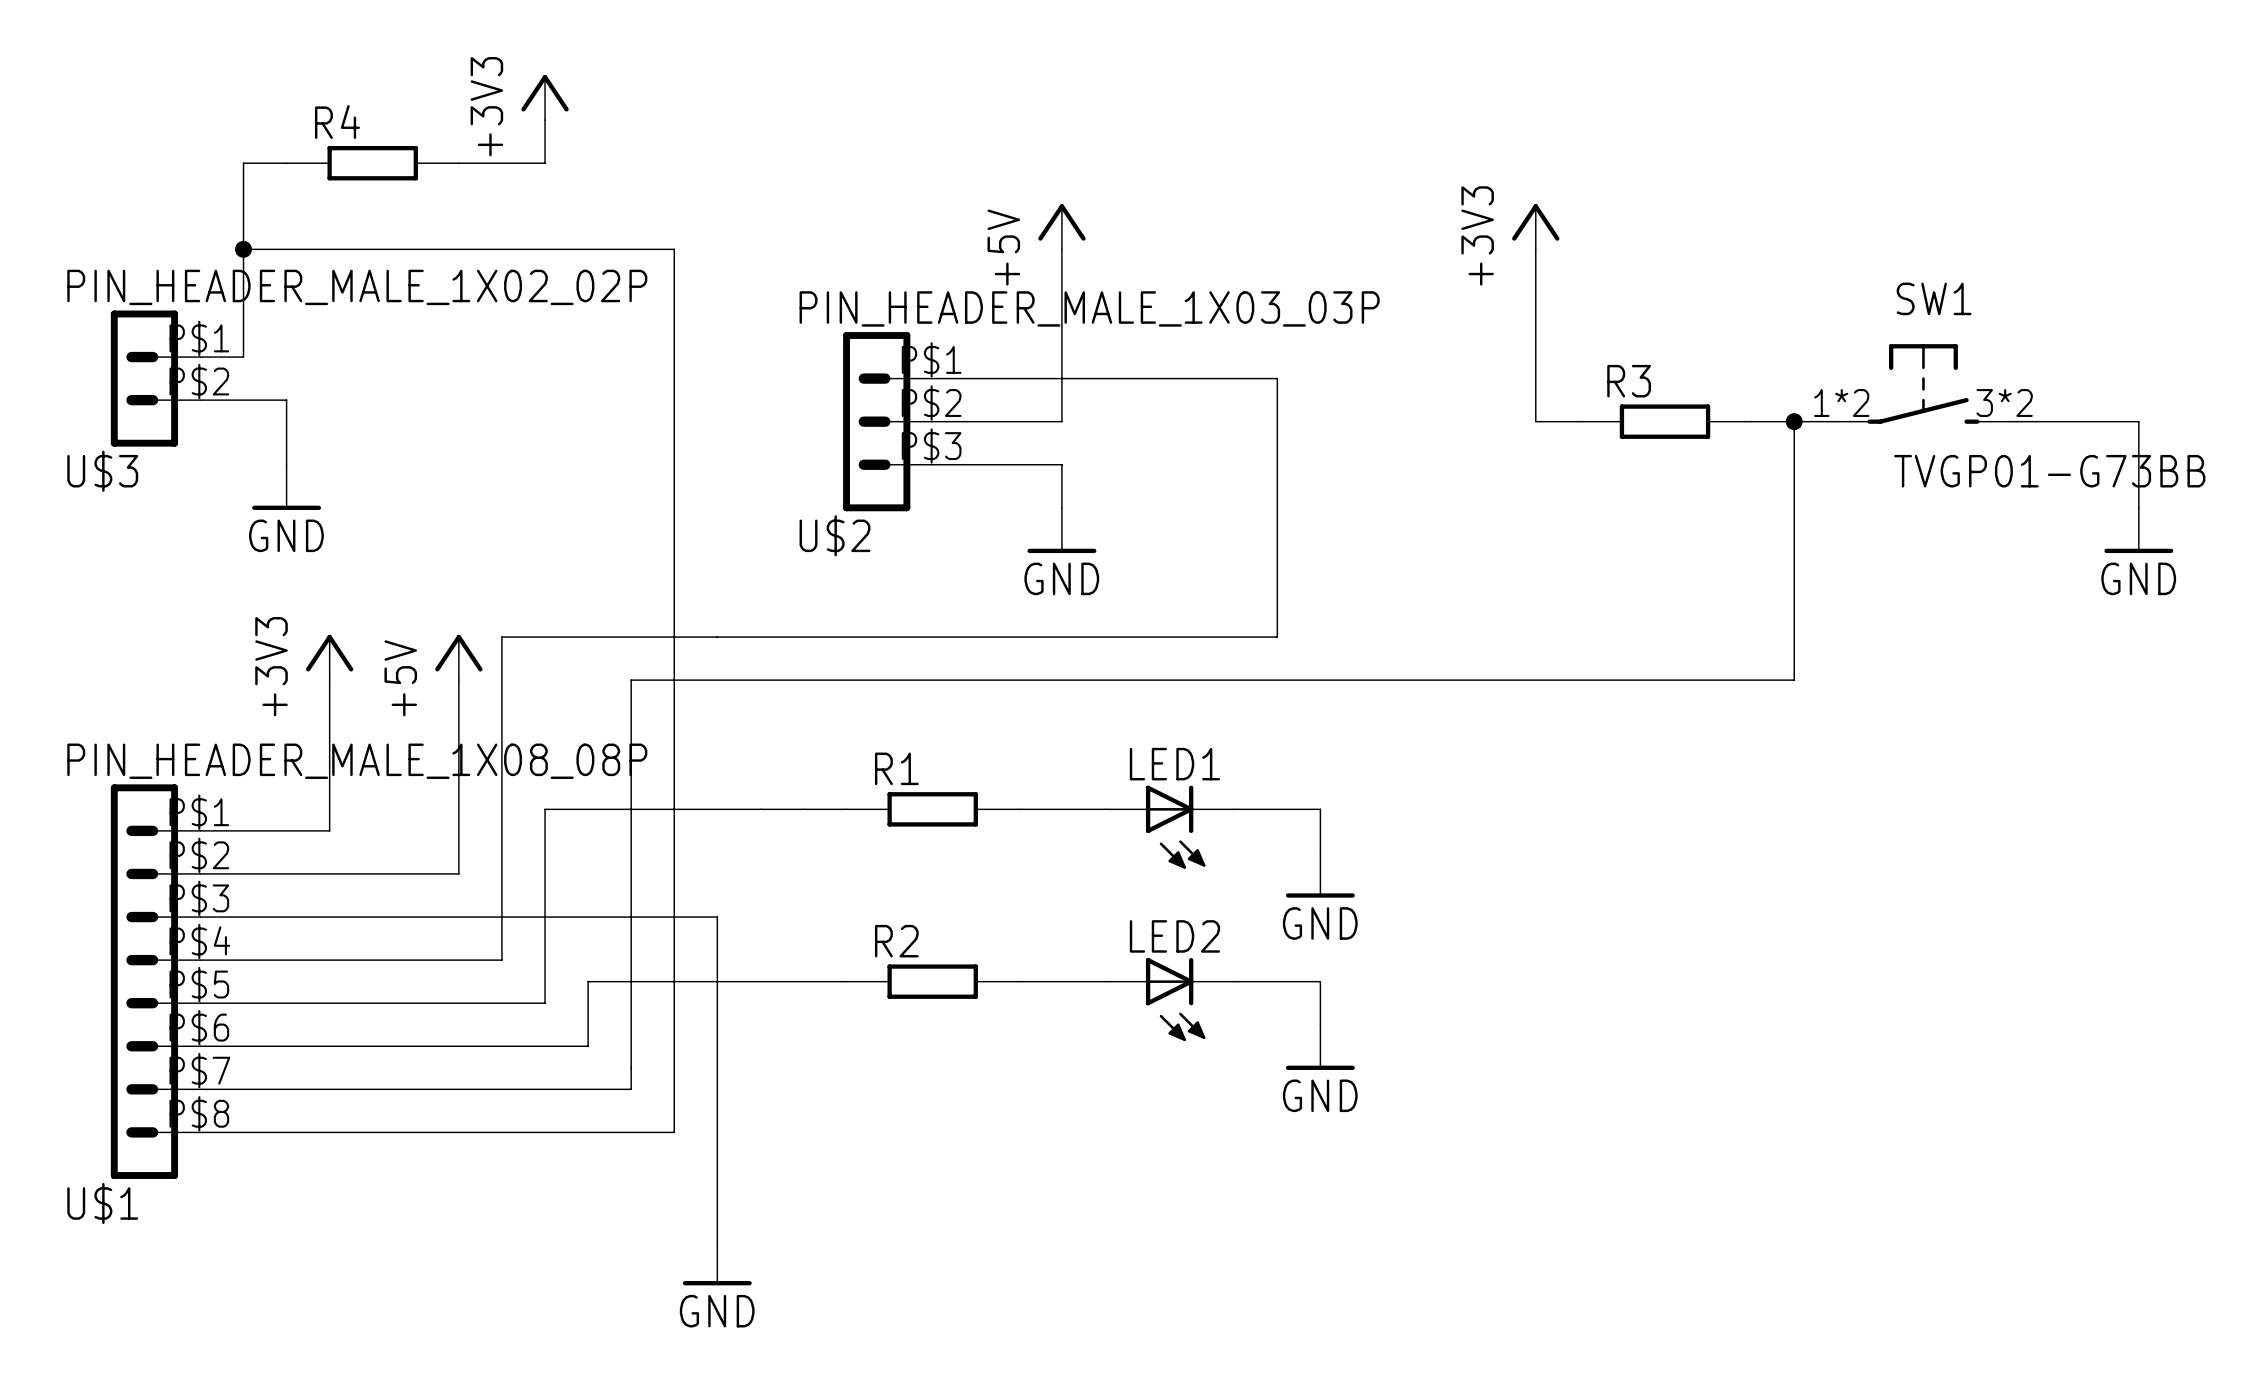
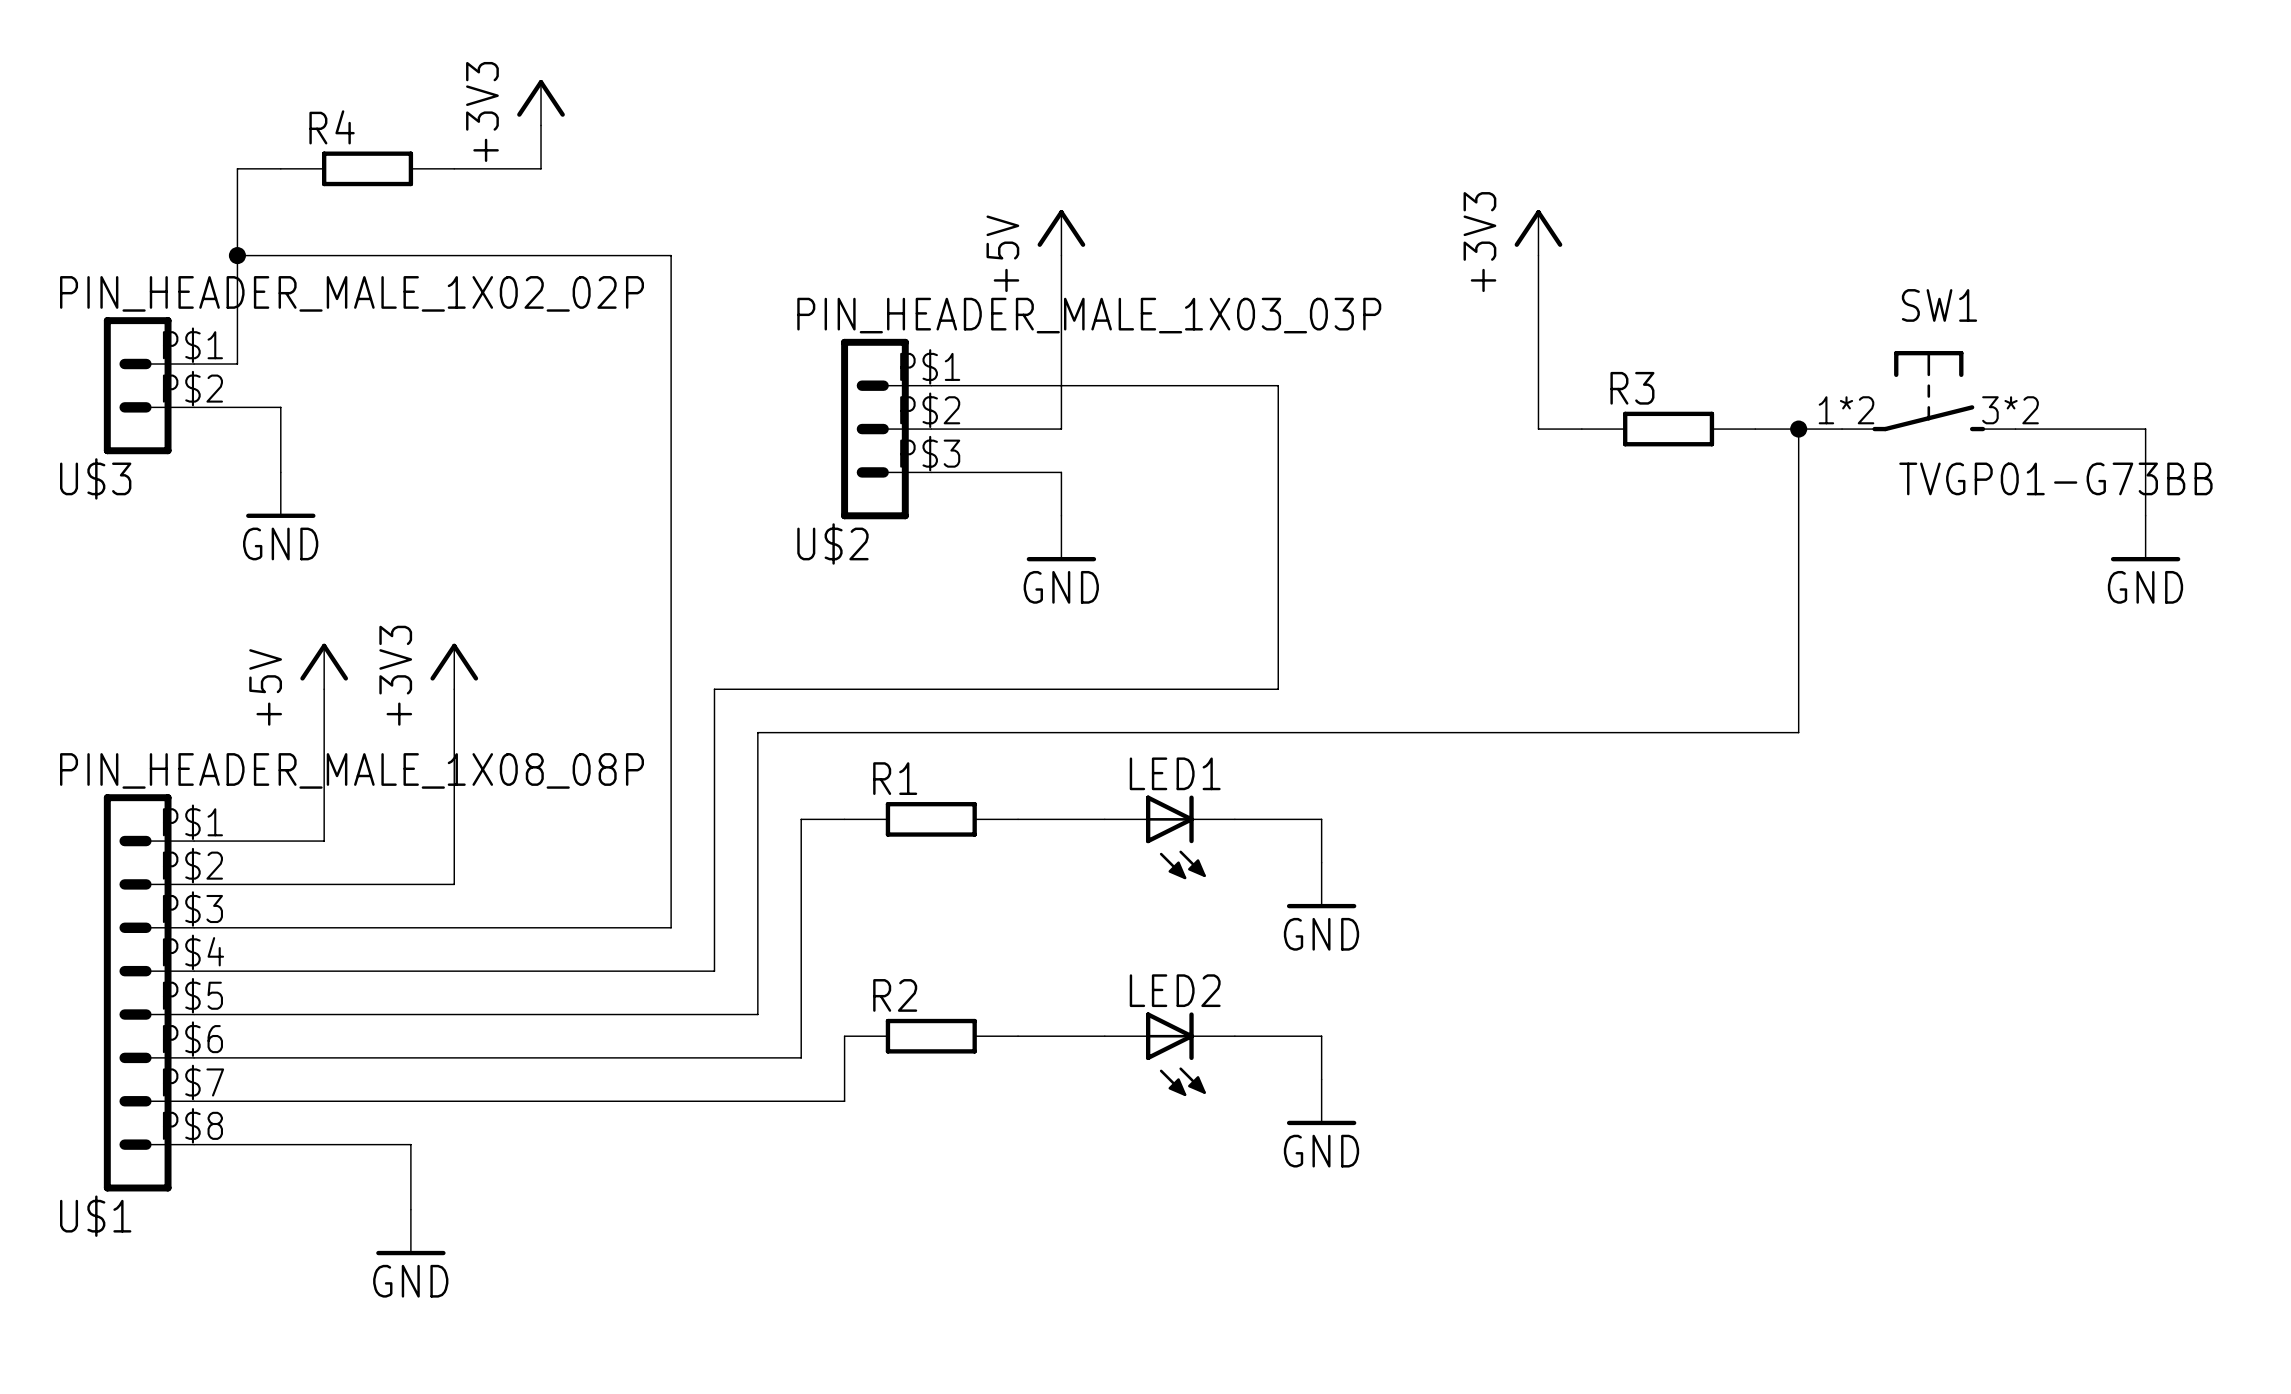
wire: (1277, 637) (501, 637) (501, 960) -> none
power symbol: +3V3 (329, 657) -> +5V (324, 666)
power symbol: +5V (458, 657) -> +3V3 (454, 666)
wire: (717, 680) (631, 680) (631, 1089) -> (714, 689) (714, 927)
wire: (1277, 680) (1794, 680) -> (1278, 689) (1278, 645)
wire: none -> (1798, 689) (1798, 732) (757, 732) (757, 1014) (541, 1014)
wire: (803, 809) (545, 809) (545, 1003) -> (801, 819) (801, 1057) (584, 1057)
wire: (717, 917) (674, 917) (674, 1132) (415, 1132) -> (410, 1209) (410, 1144)
wire: (717, 960) (717, 1240) -> (714, 971) (497, 971)
wire: (846, 981) (588, 981) (588, 1046) -> none
R2 position: (932, 981) -> (931, 1036)
wire: (1018, 981) (1105, 981) -> (1018, 1036) (1104, 1036)
wire: (1234, 981) (1320, 981) (1320, 1024) -> (1234, 1036) (1321, 1036) (1321, 1079)
LED2 position: (1169, 999) -> (1169, 1054)
wire: none -> (844, 1036) (844, 1101) (627, 1101)
power symbol position: GND (1320, 1047) -> GND (1321, 1102)
power symbol position: GND (717, 1262) -> GND (410, 1232)

